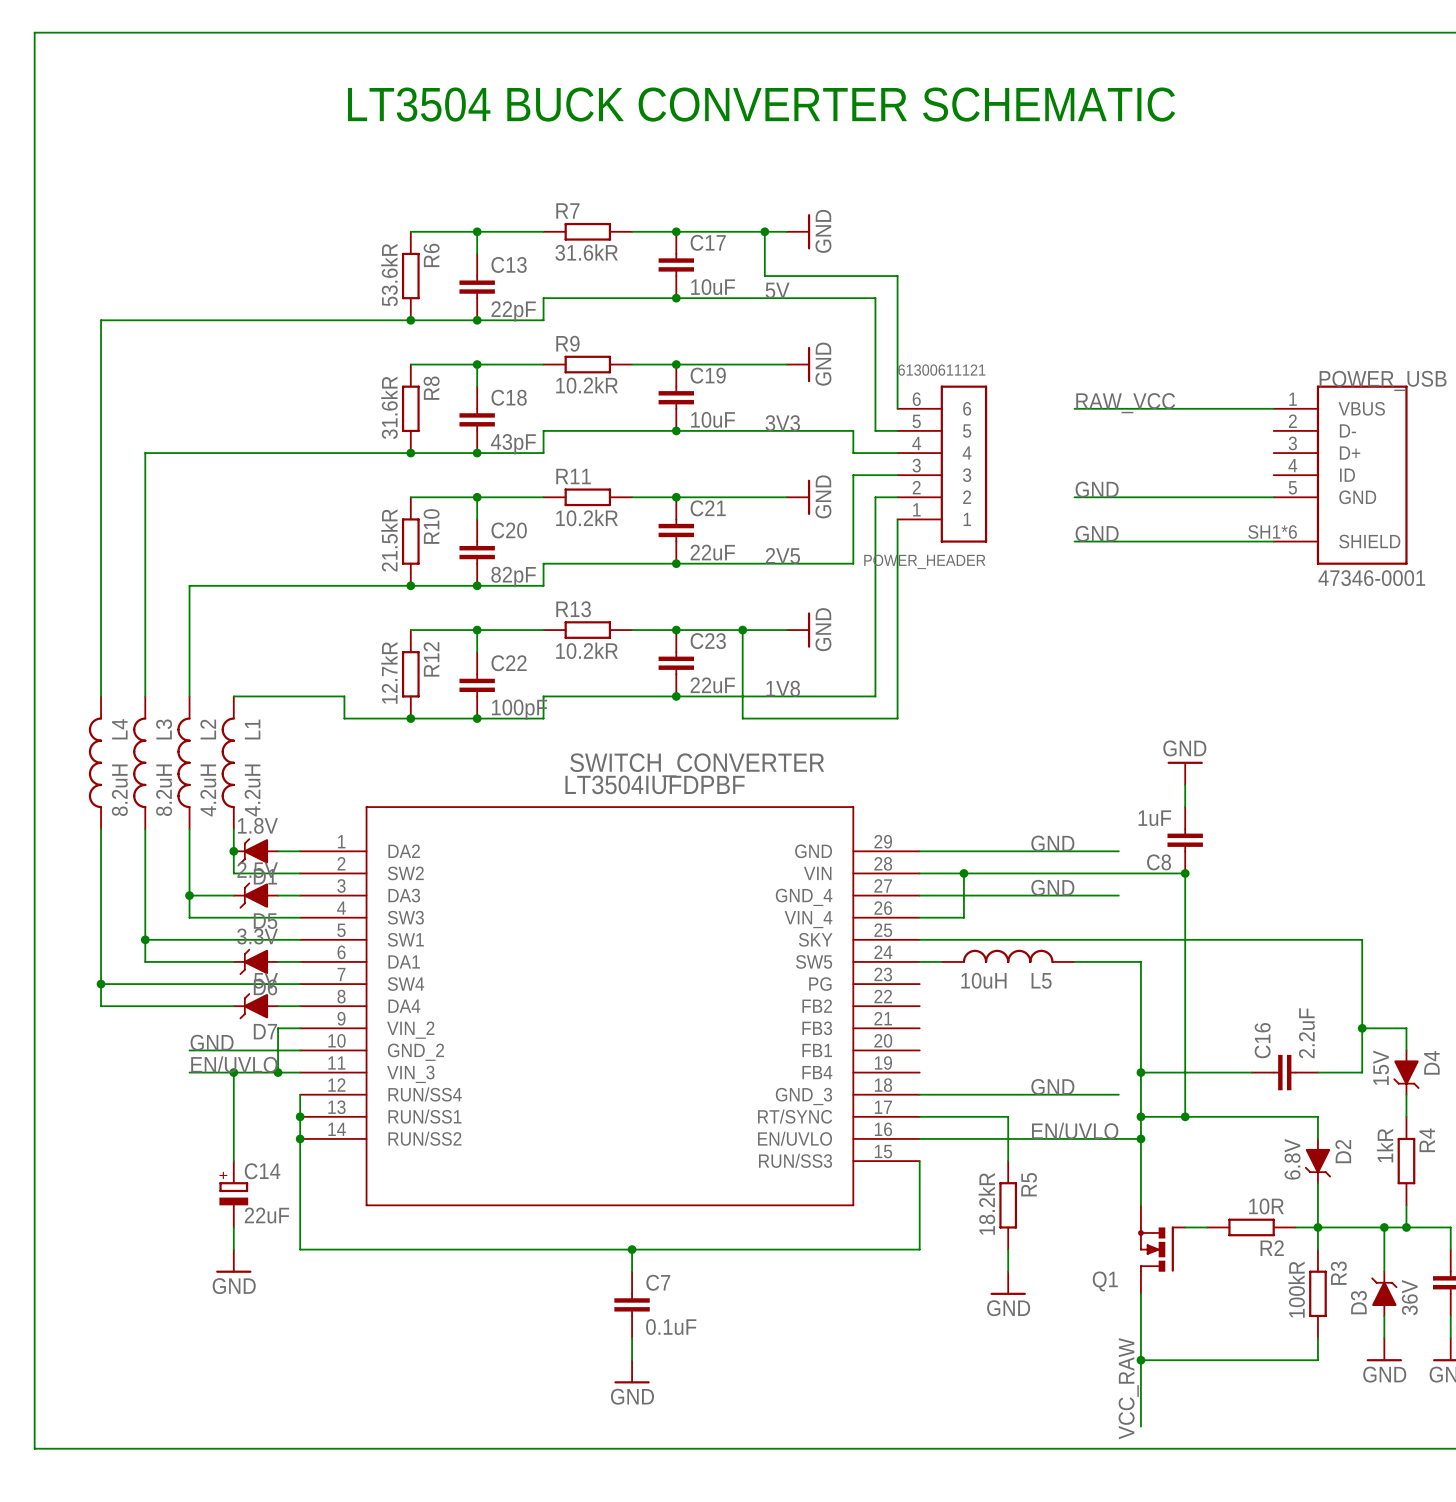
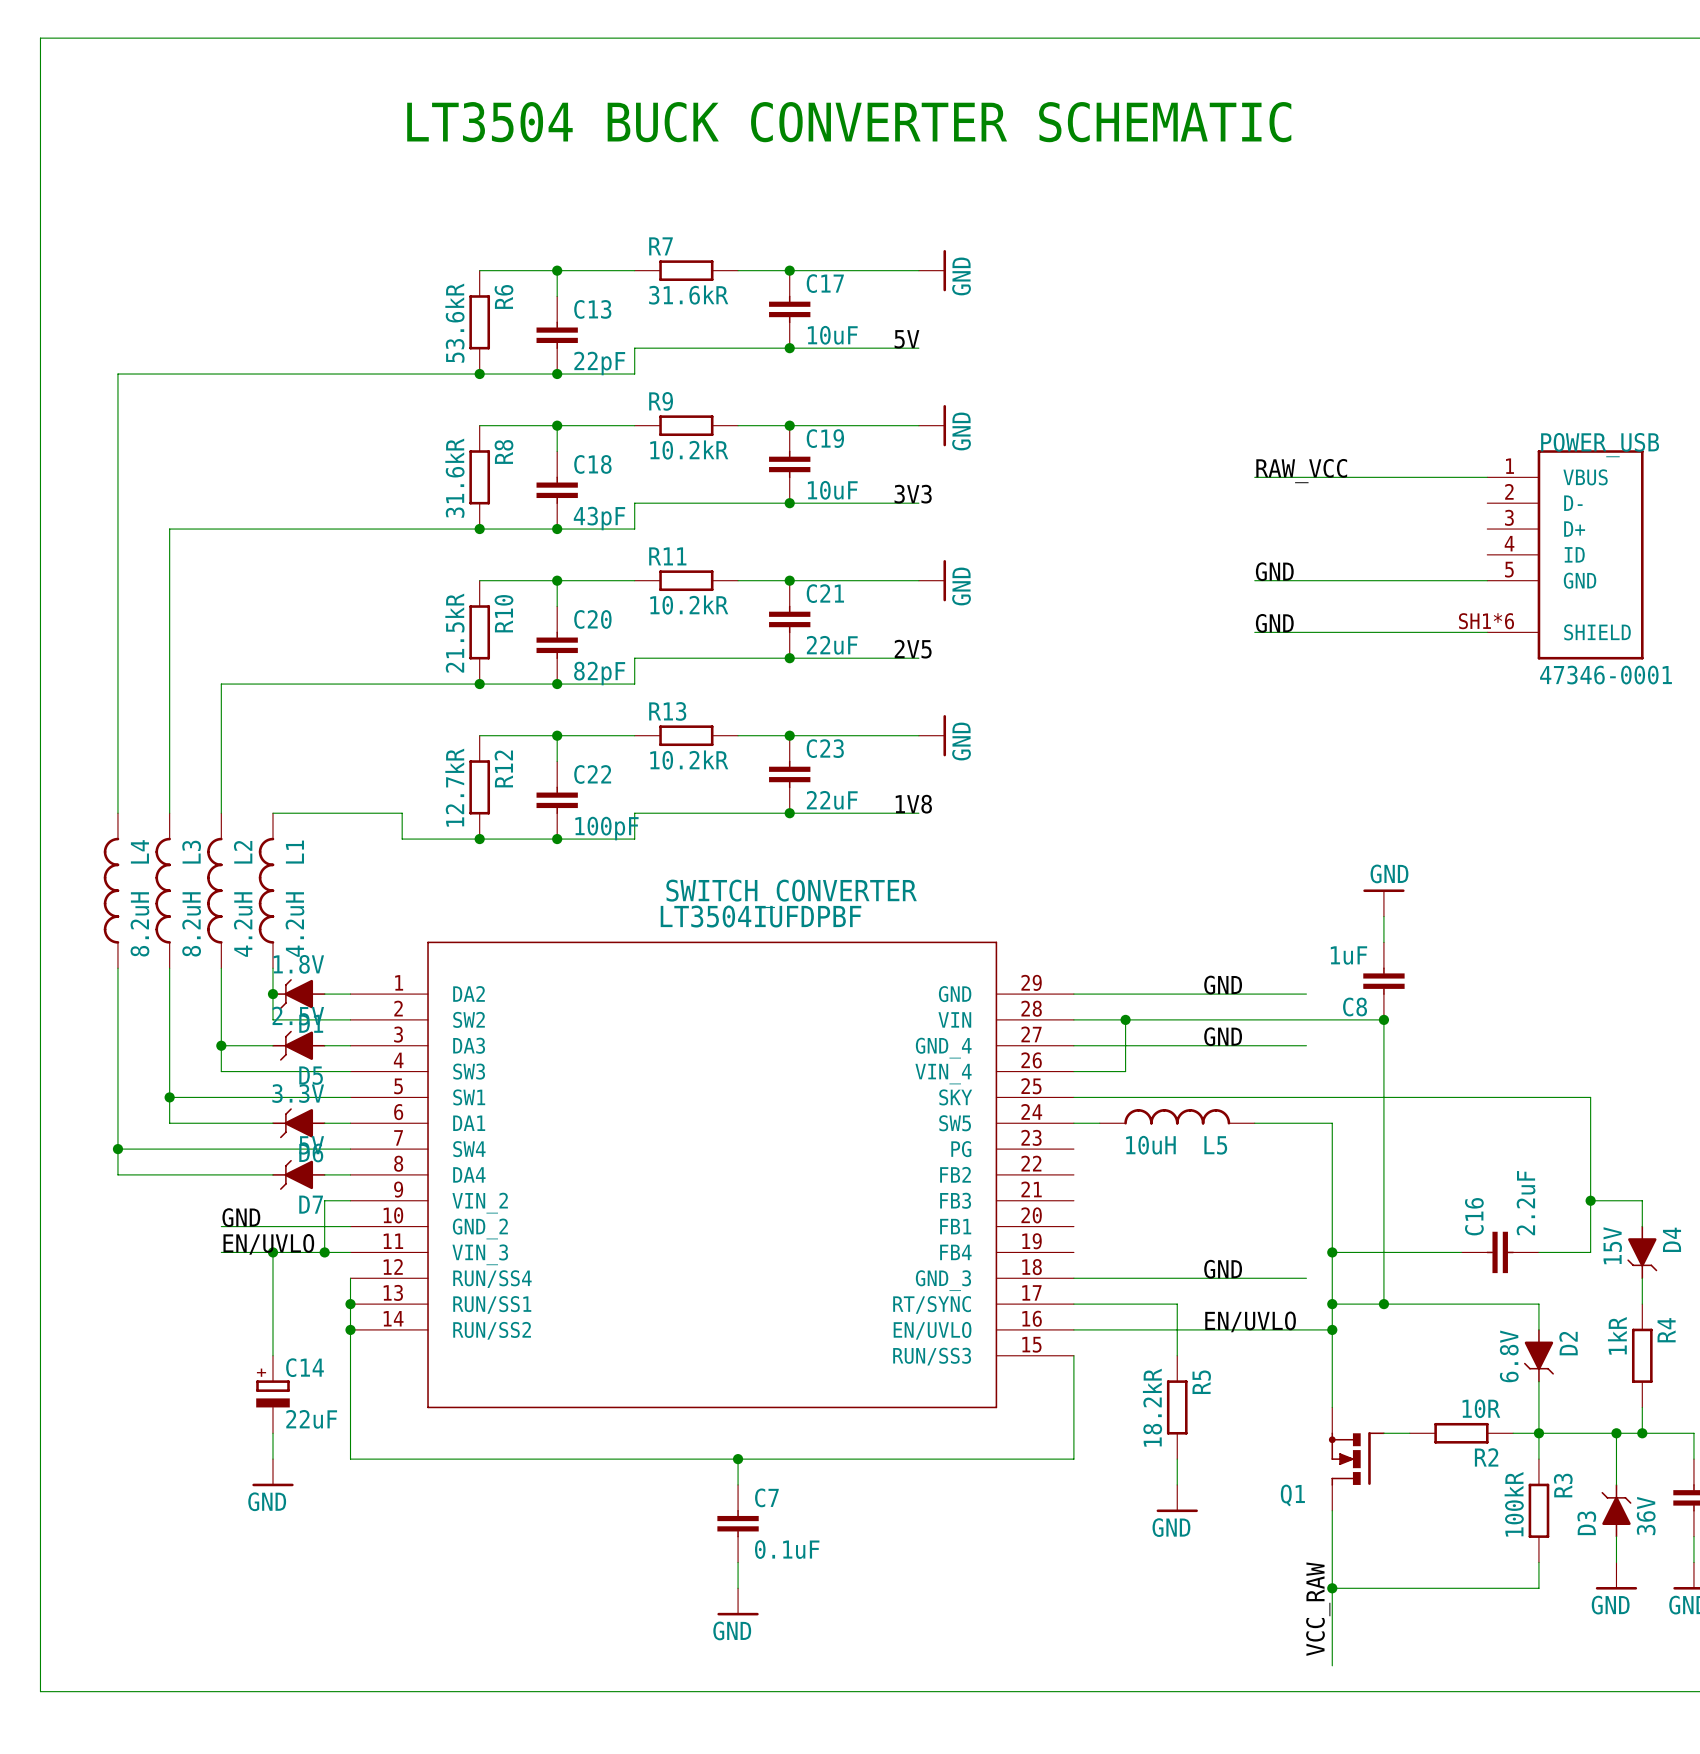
wire: (764, 231) (764, 276) (897, 276) (897, 408) -> none
junction: (764, 231) -> none
wire: (786, 298) (875, 298) (875, 430) (897, 430) -> none
wire: (786, 430) (853, 430) (853, 453) (897, 453) -> none
POWER_HEADER: 61300611121 (942, 464) -> none
wire: (897, 475) (853, 475) (853, 563) (786, 563) -> none
wire: (897, 497) (875, 497) (875, 696) (786, 696) -> none
wire: (897, 519) (897, 718) (742, 718) (742, 630) -> none
junction: (742, 630) -> none

